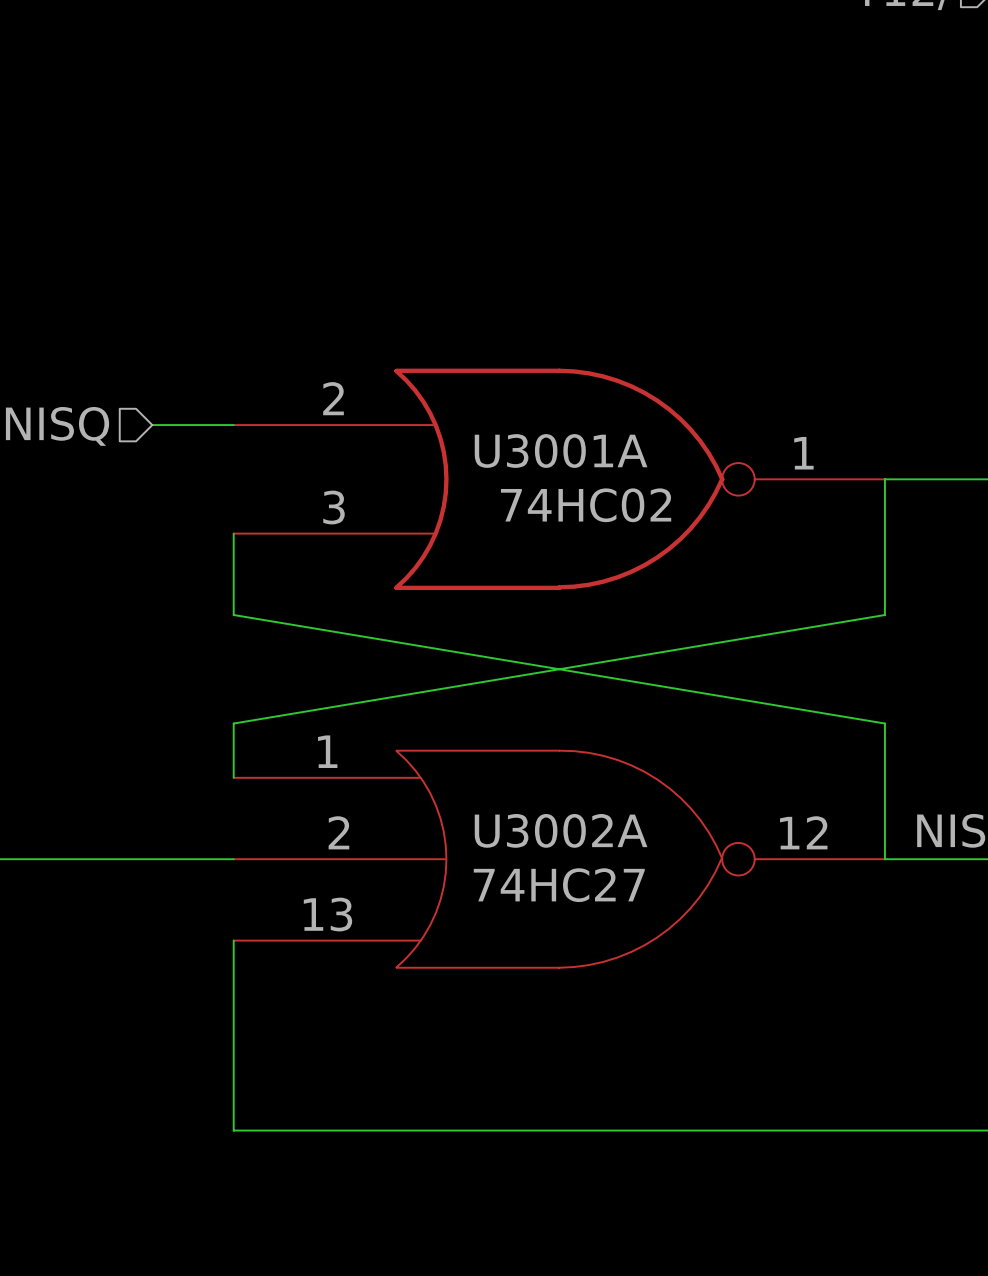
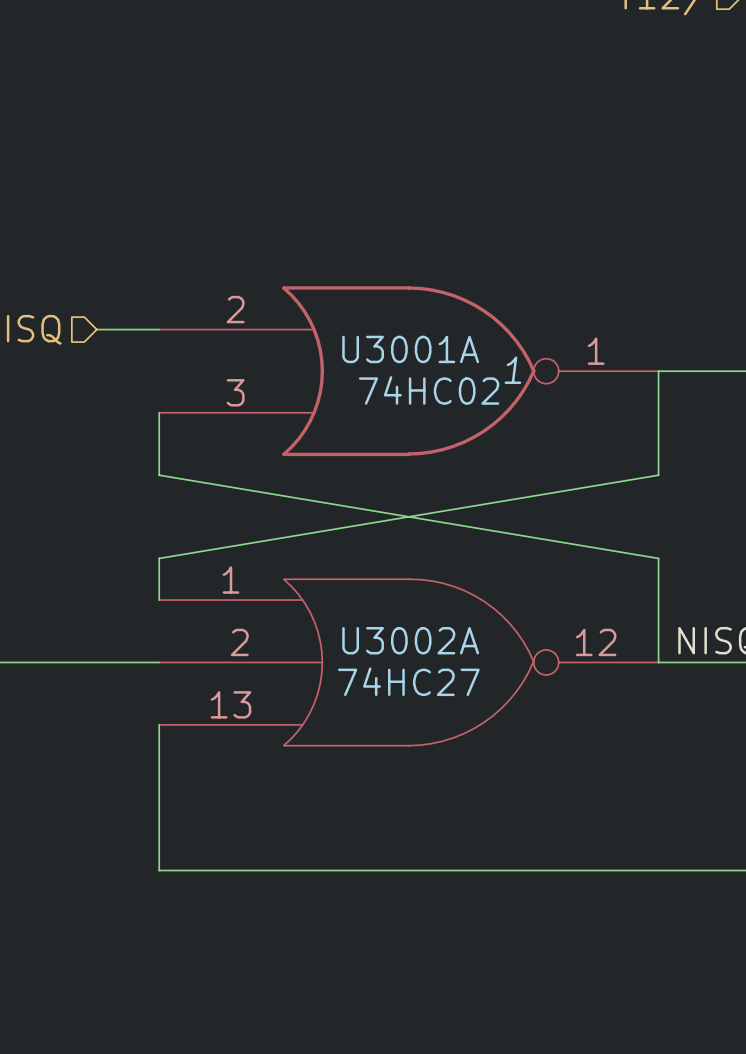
U3001A text: none -> 1 (512, 370)

